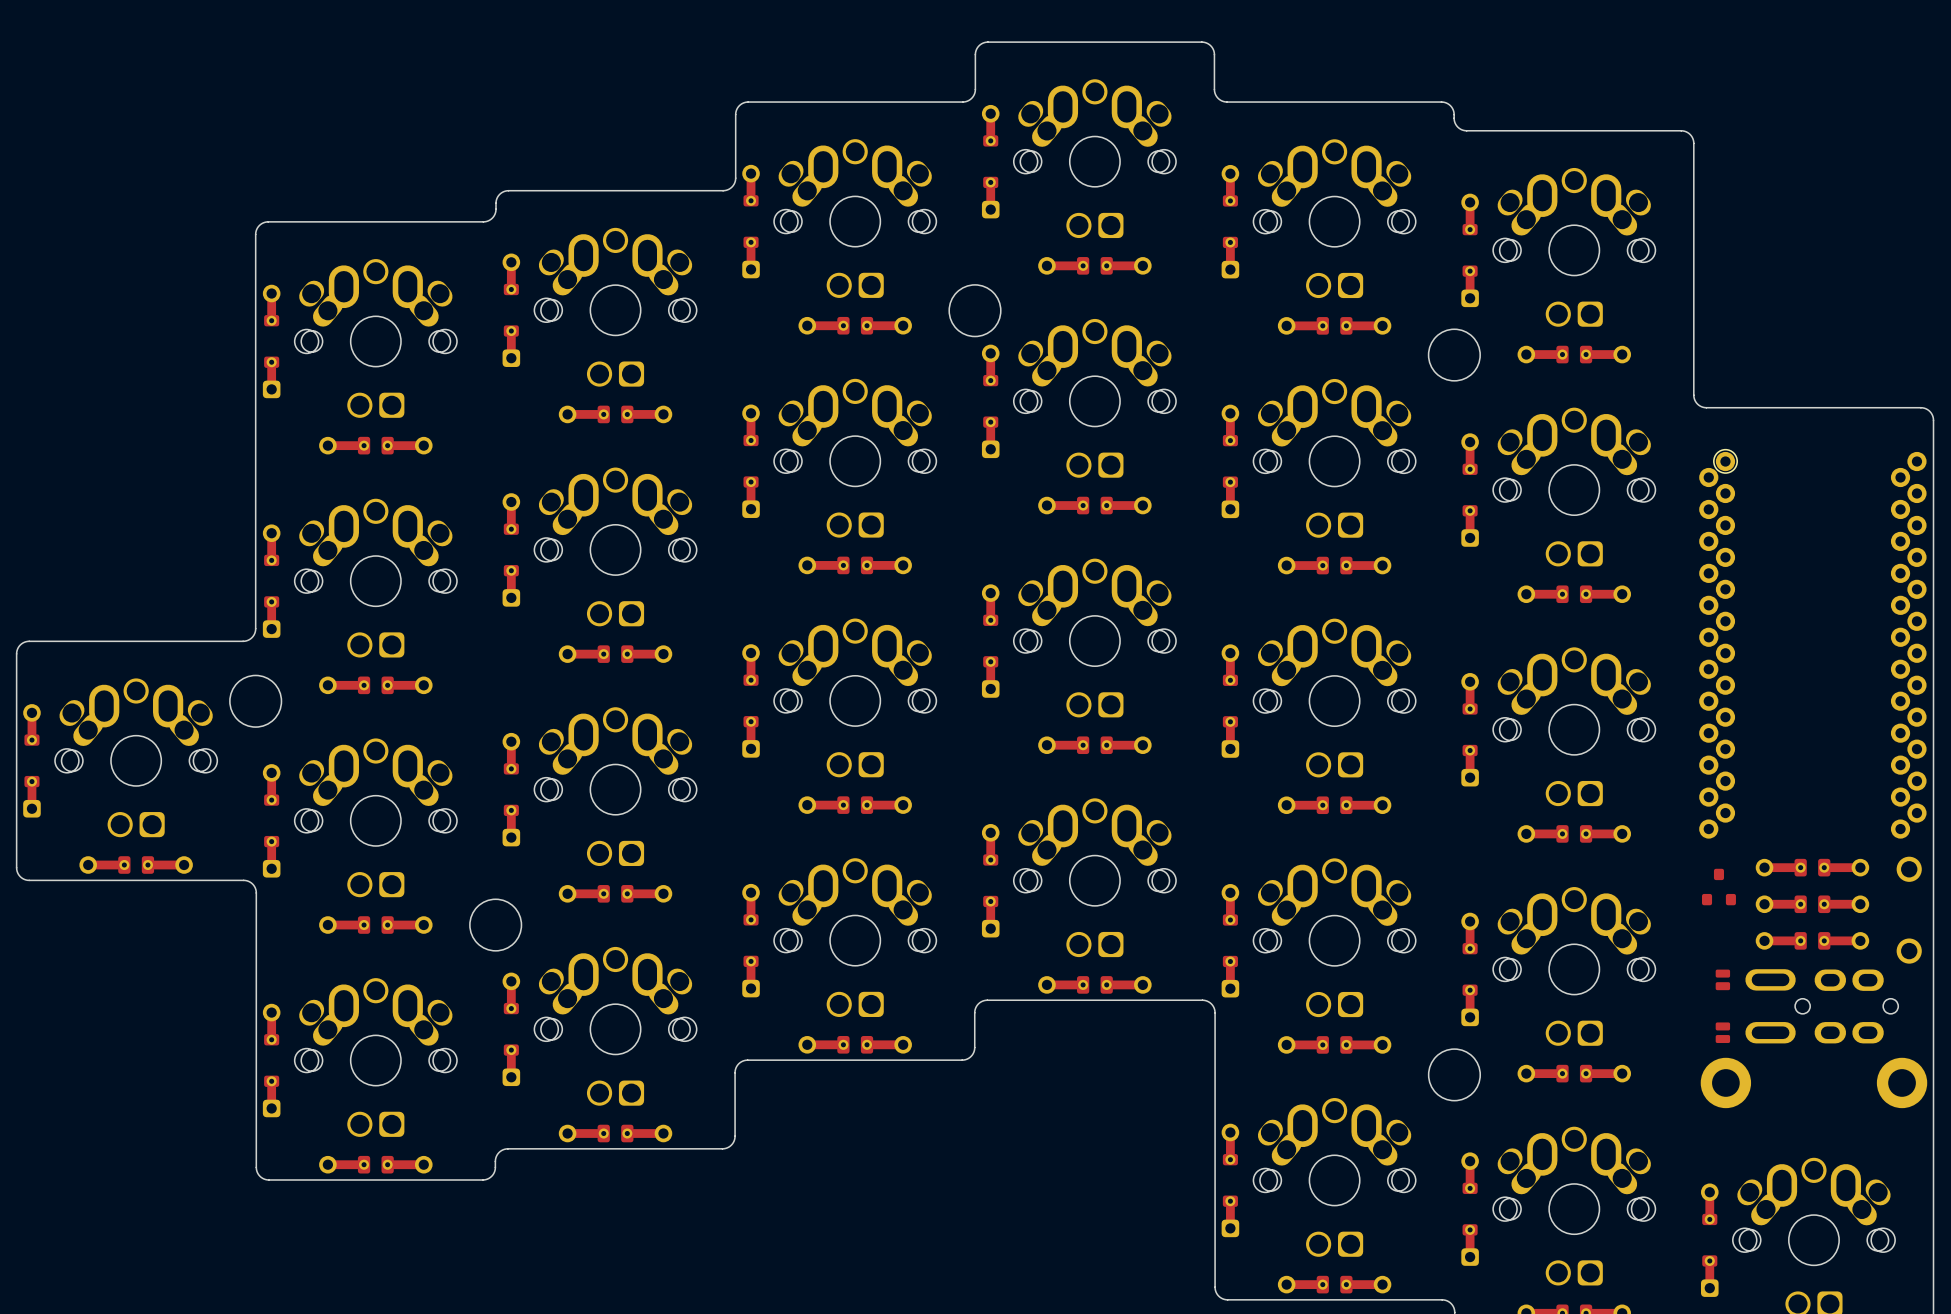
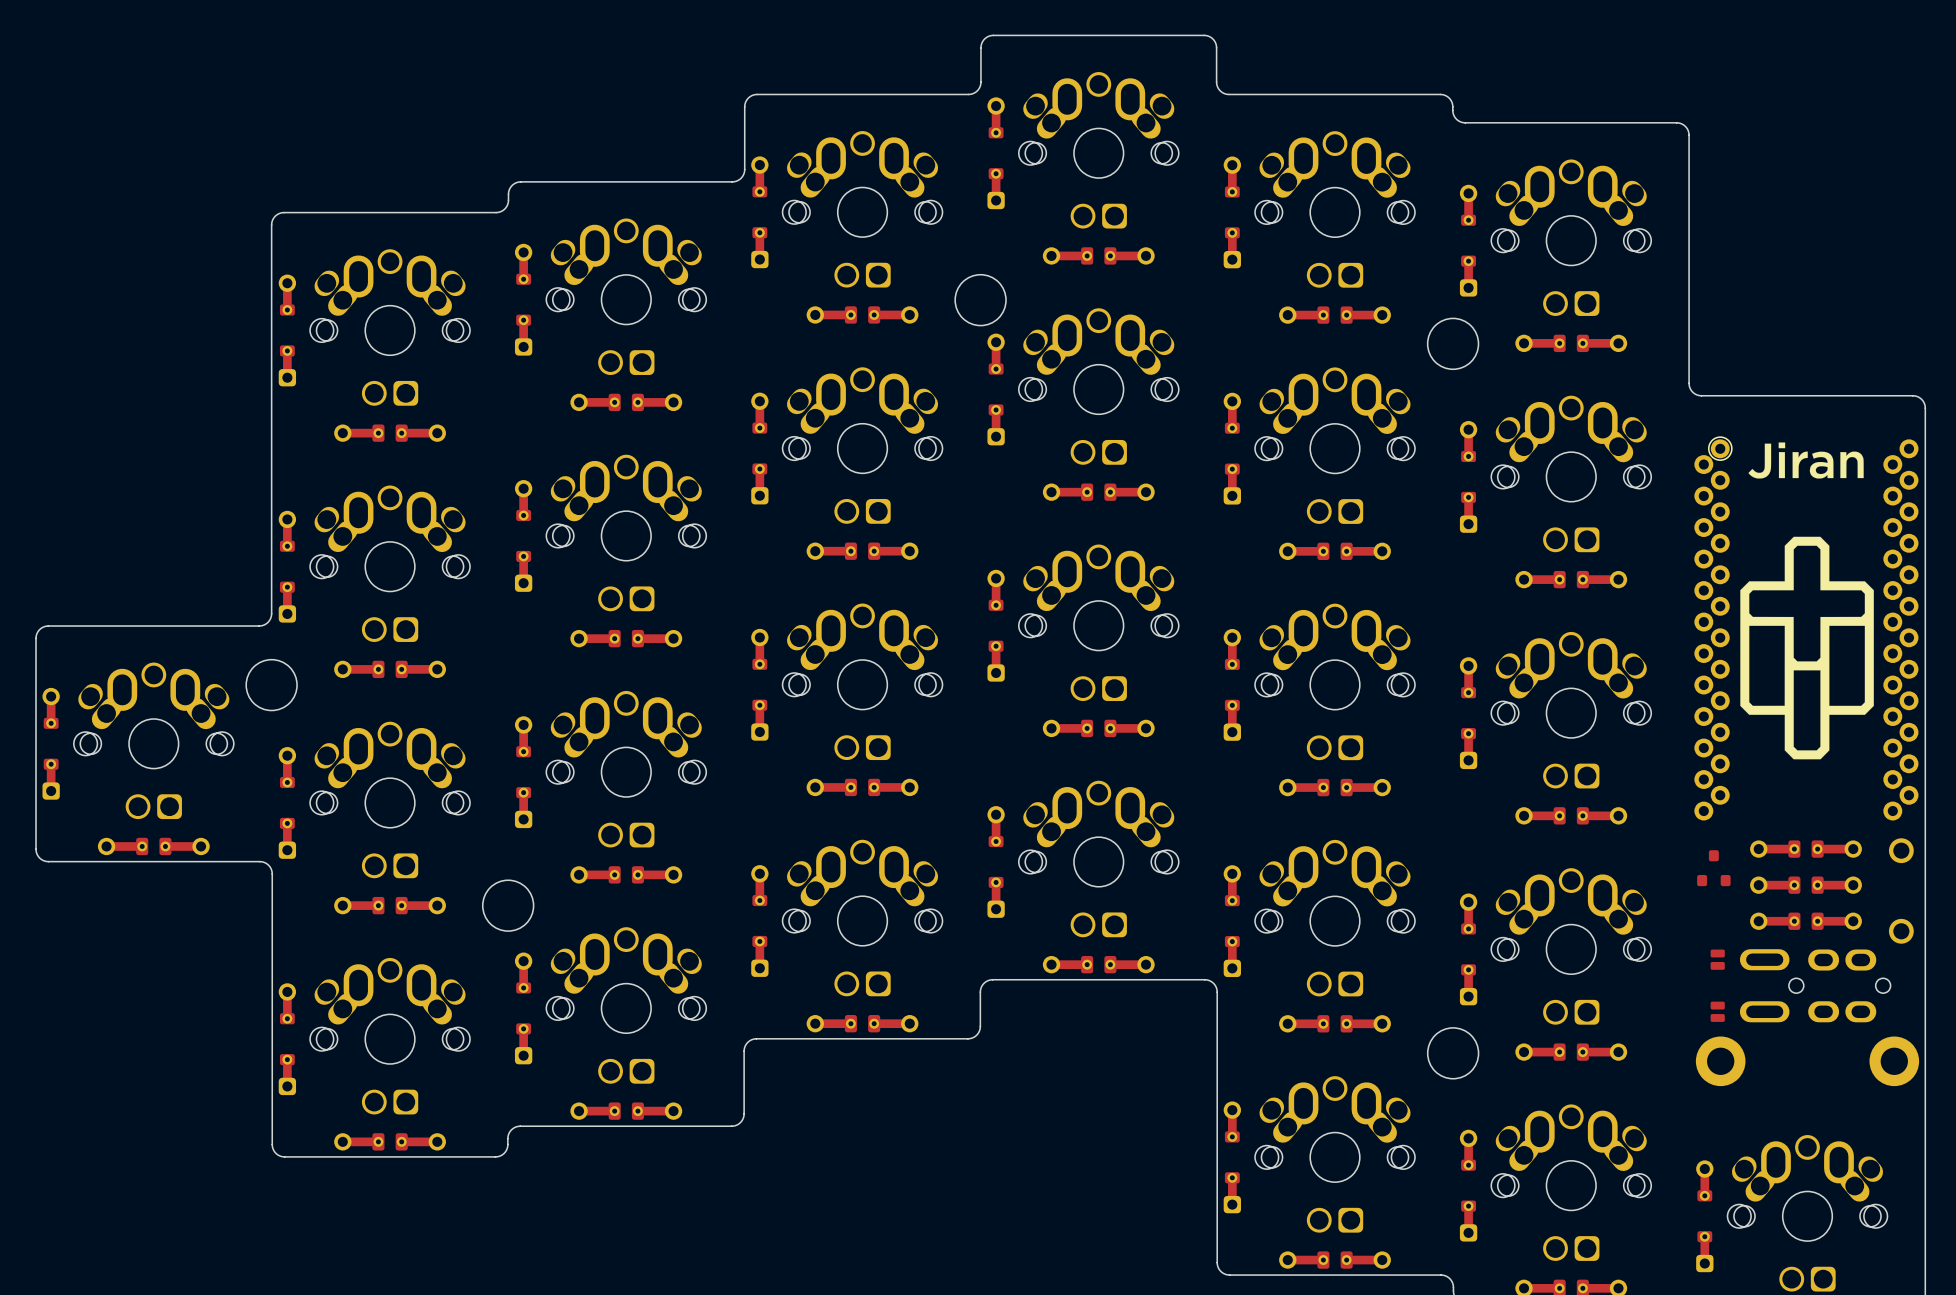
drawing: none -> [1740, 442, 1874, 760]

